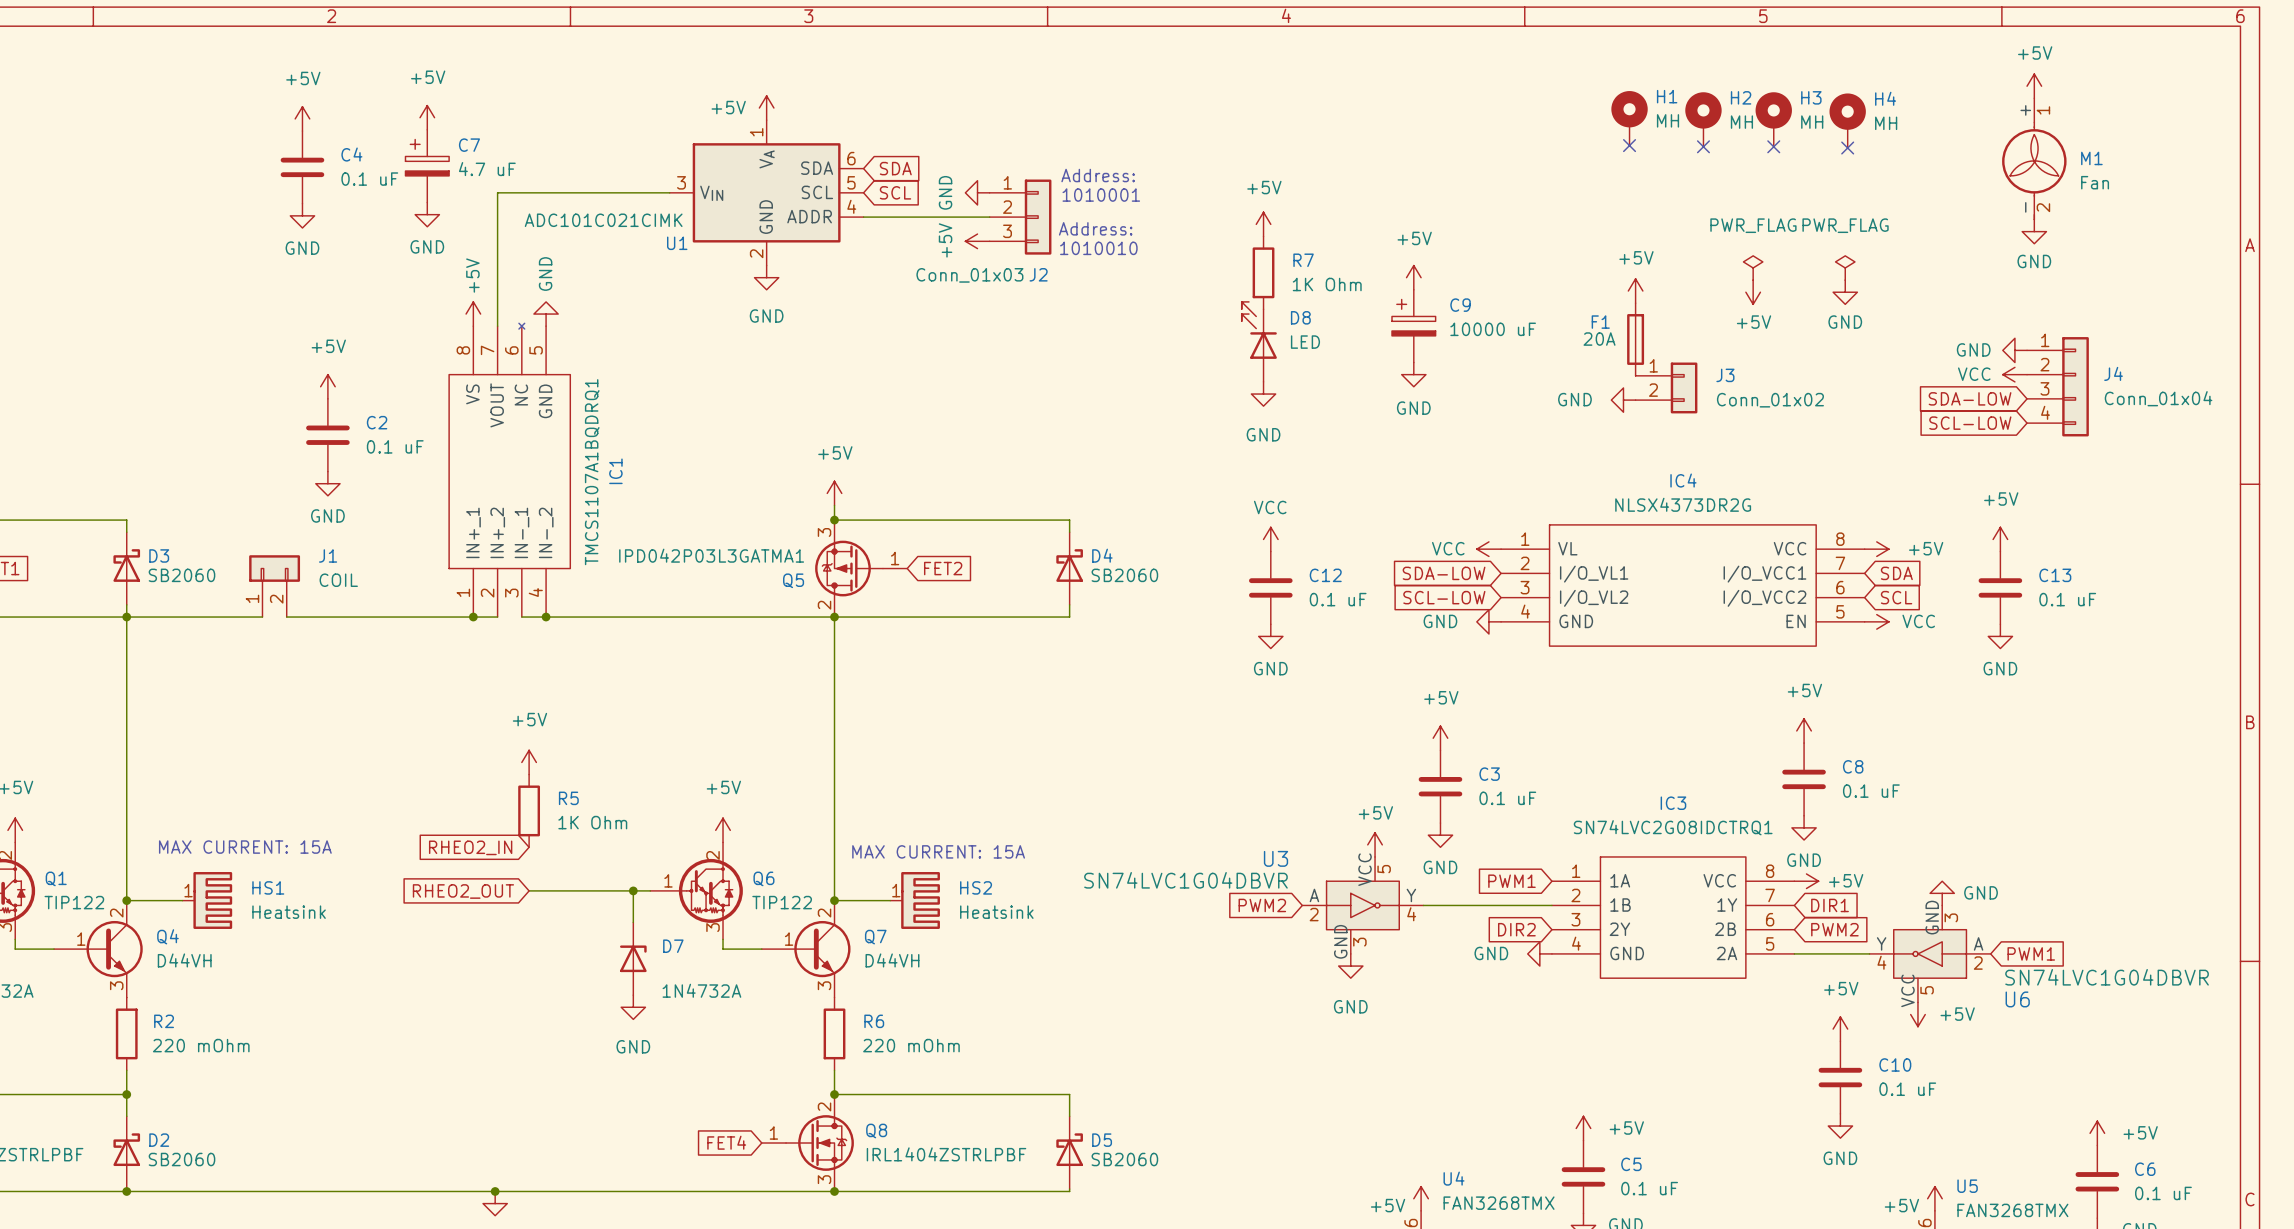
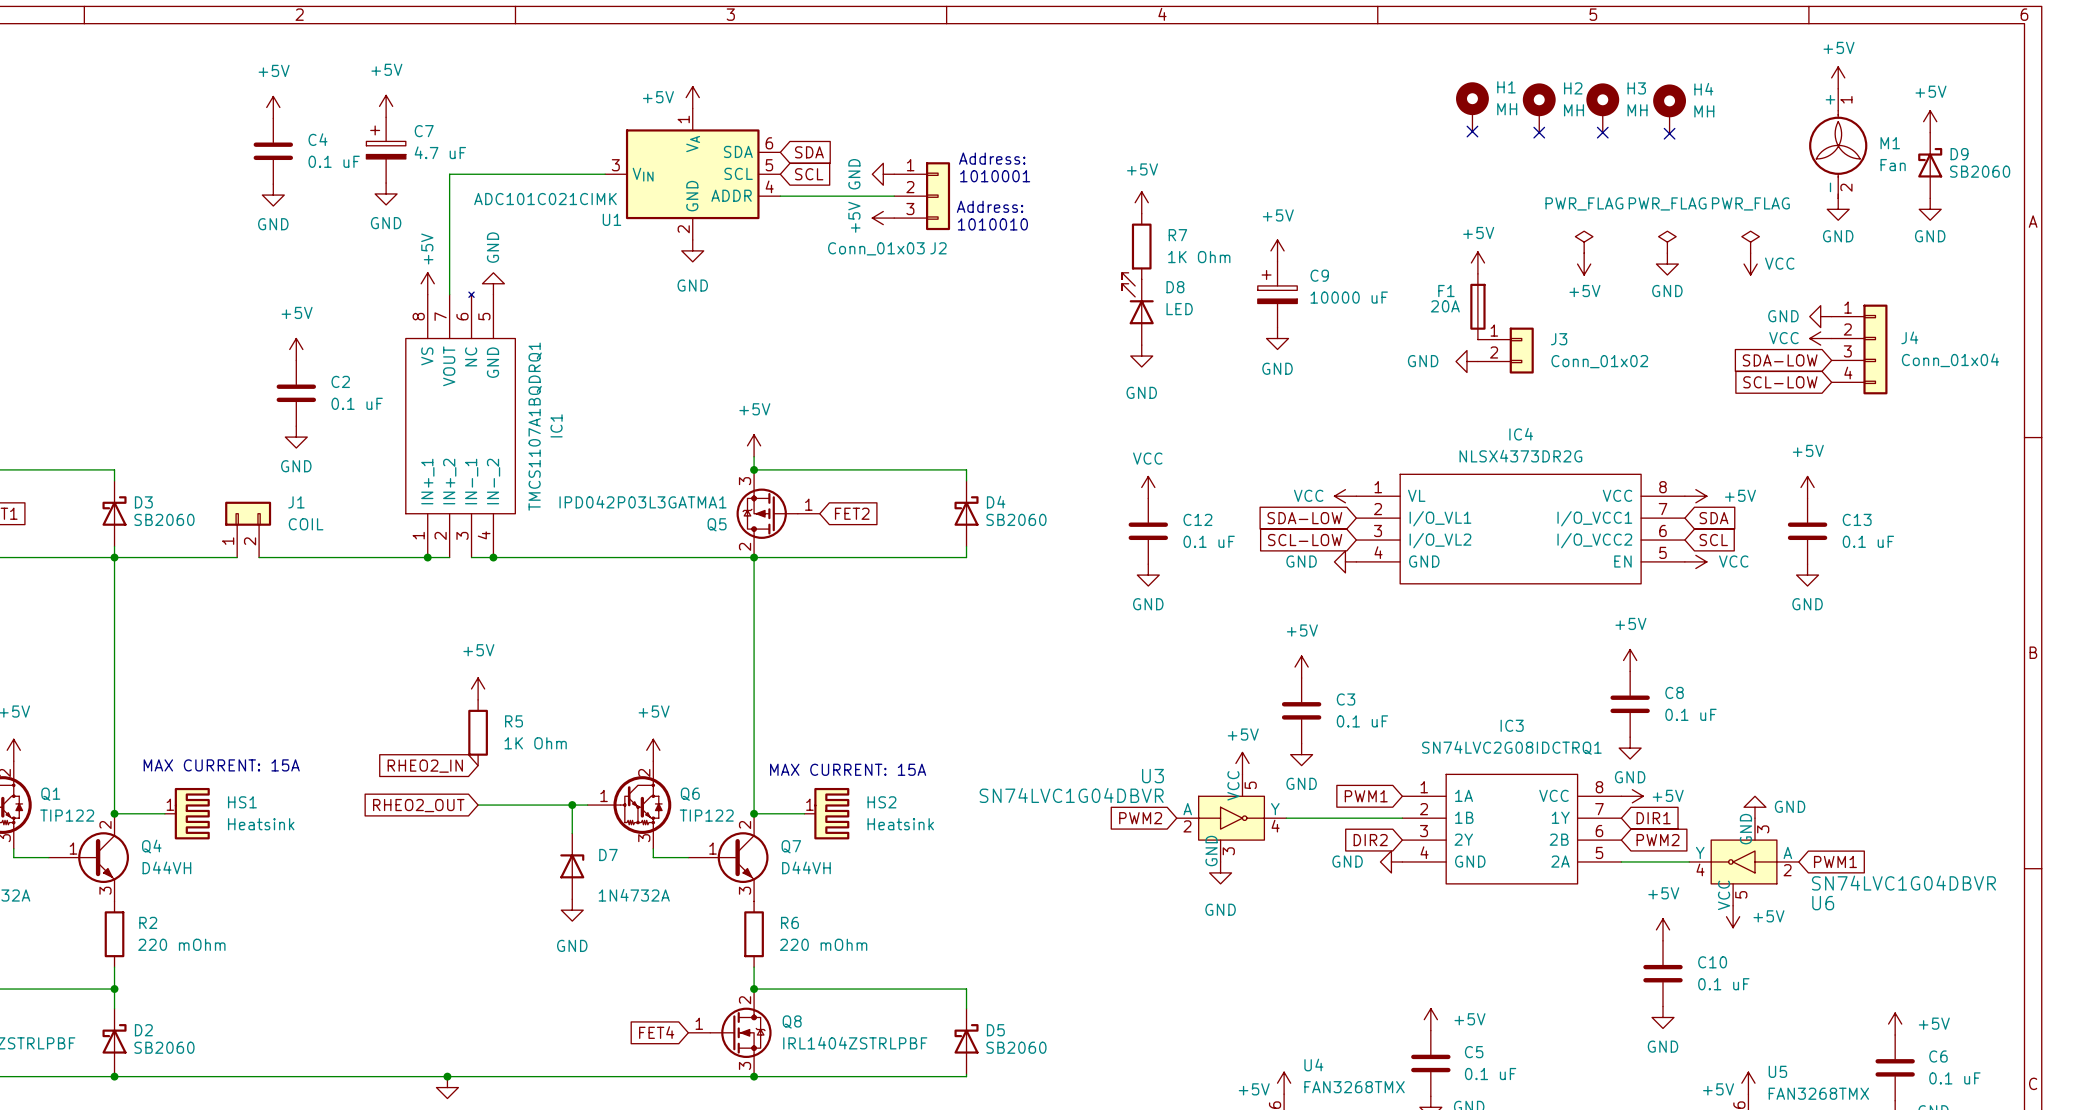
power symbol: none -> +5V (1930, 121)
D9: none -> SB2060 (1930, 165)
power symbol: none -> GND (1930, 209)
power symbol: none -> PWR_FLAG (1750, 242)
power symbol: none -> VCC (1750, 264)

